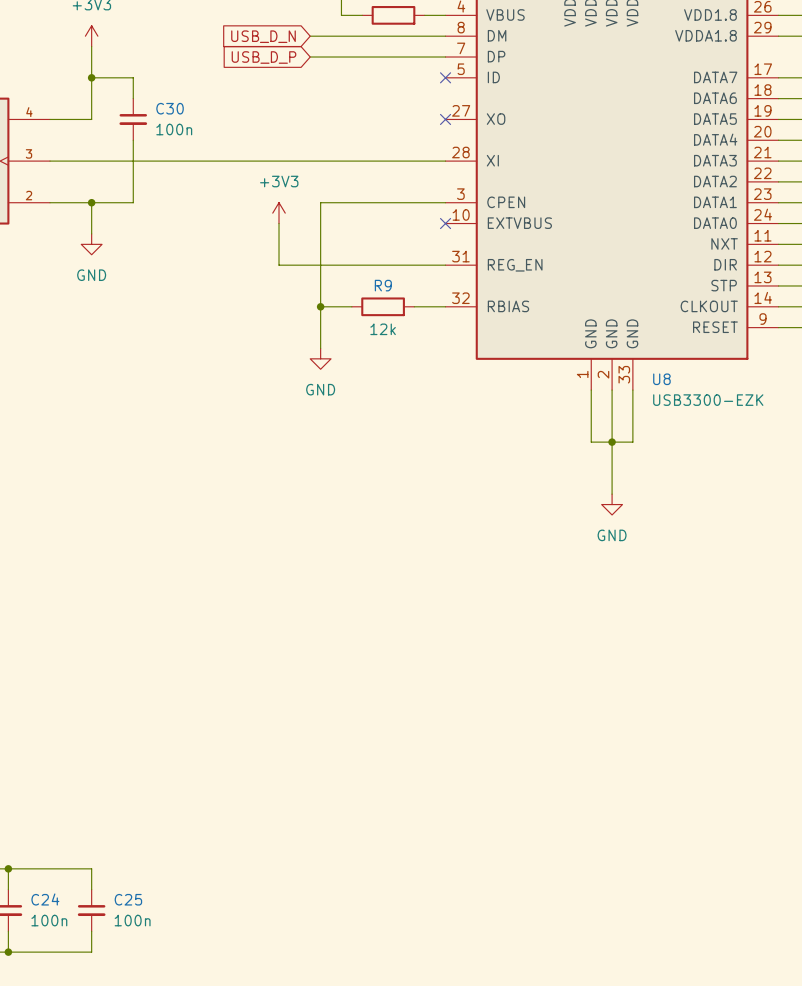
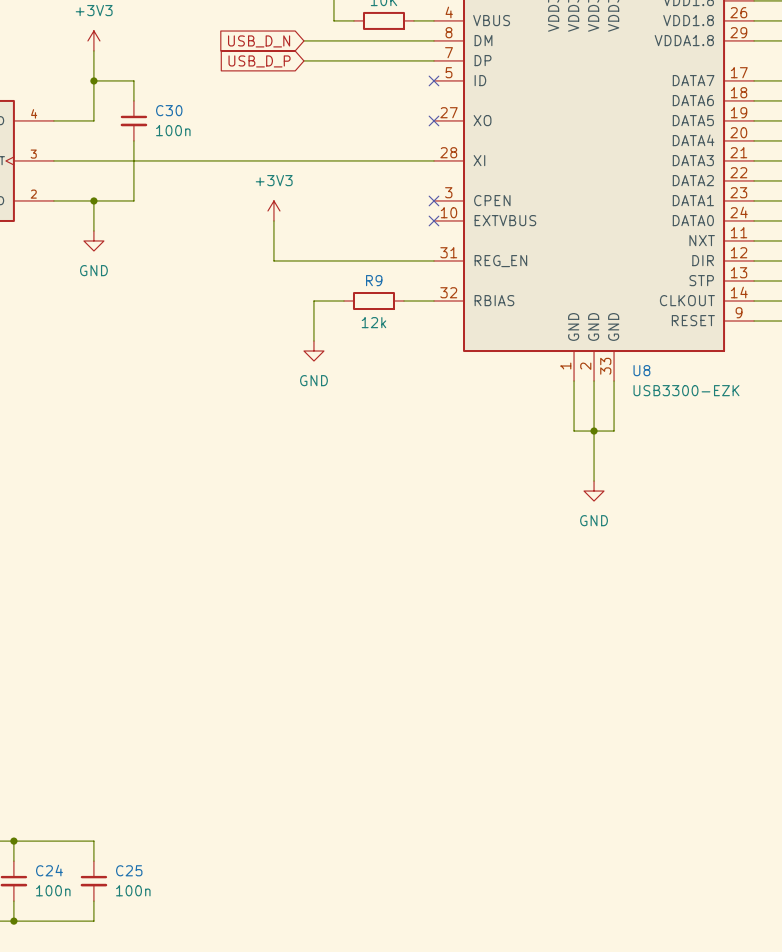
wire: (445, 202) (320, 202) (320, 306) -> none
no-connect mark: none -> (433, 200)
junction: (320, 306) -> none

